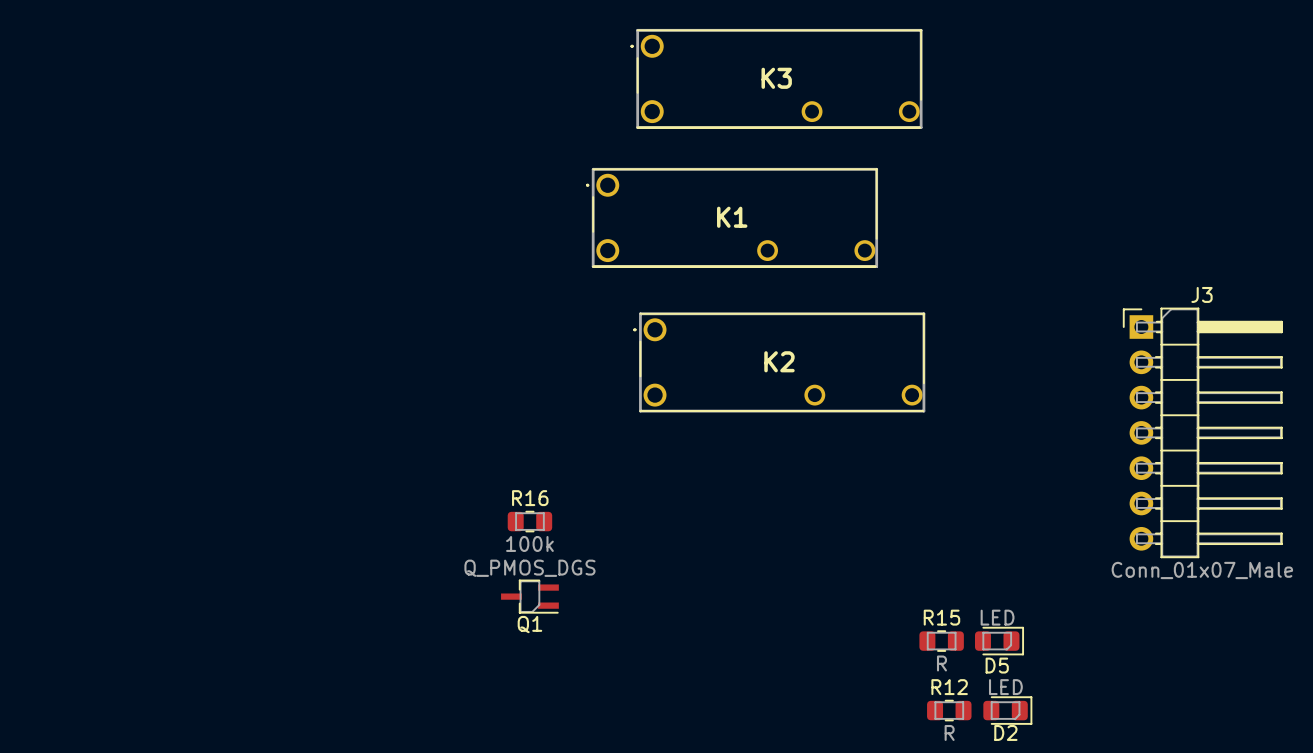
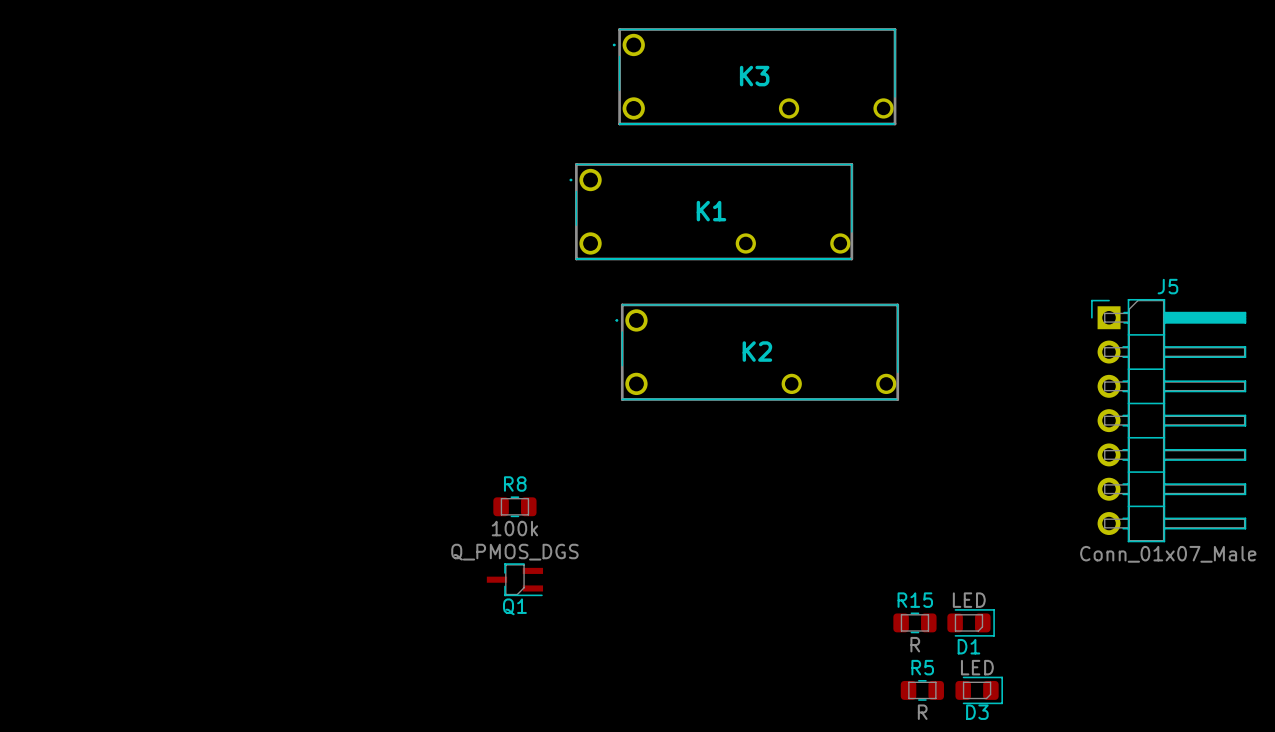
J3 name: J3 (1202, 294) -> J5 (1167, 286)
R16 name: R16 (530, 498) -> R8 (515, 483)
D5 name: D5 (997, 665) -> D1 (968, 646)
R12 name: R12 (949, 687) -> R5 (922, 667)
D2 name: D2 (1005, 732) -> D3 (977, 712)

